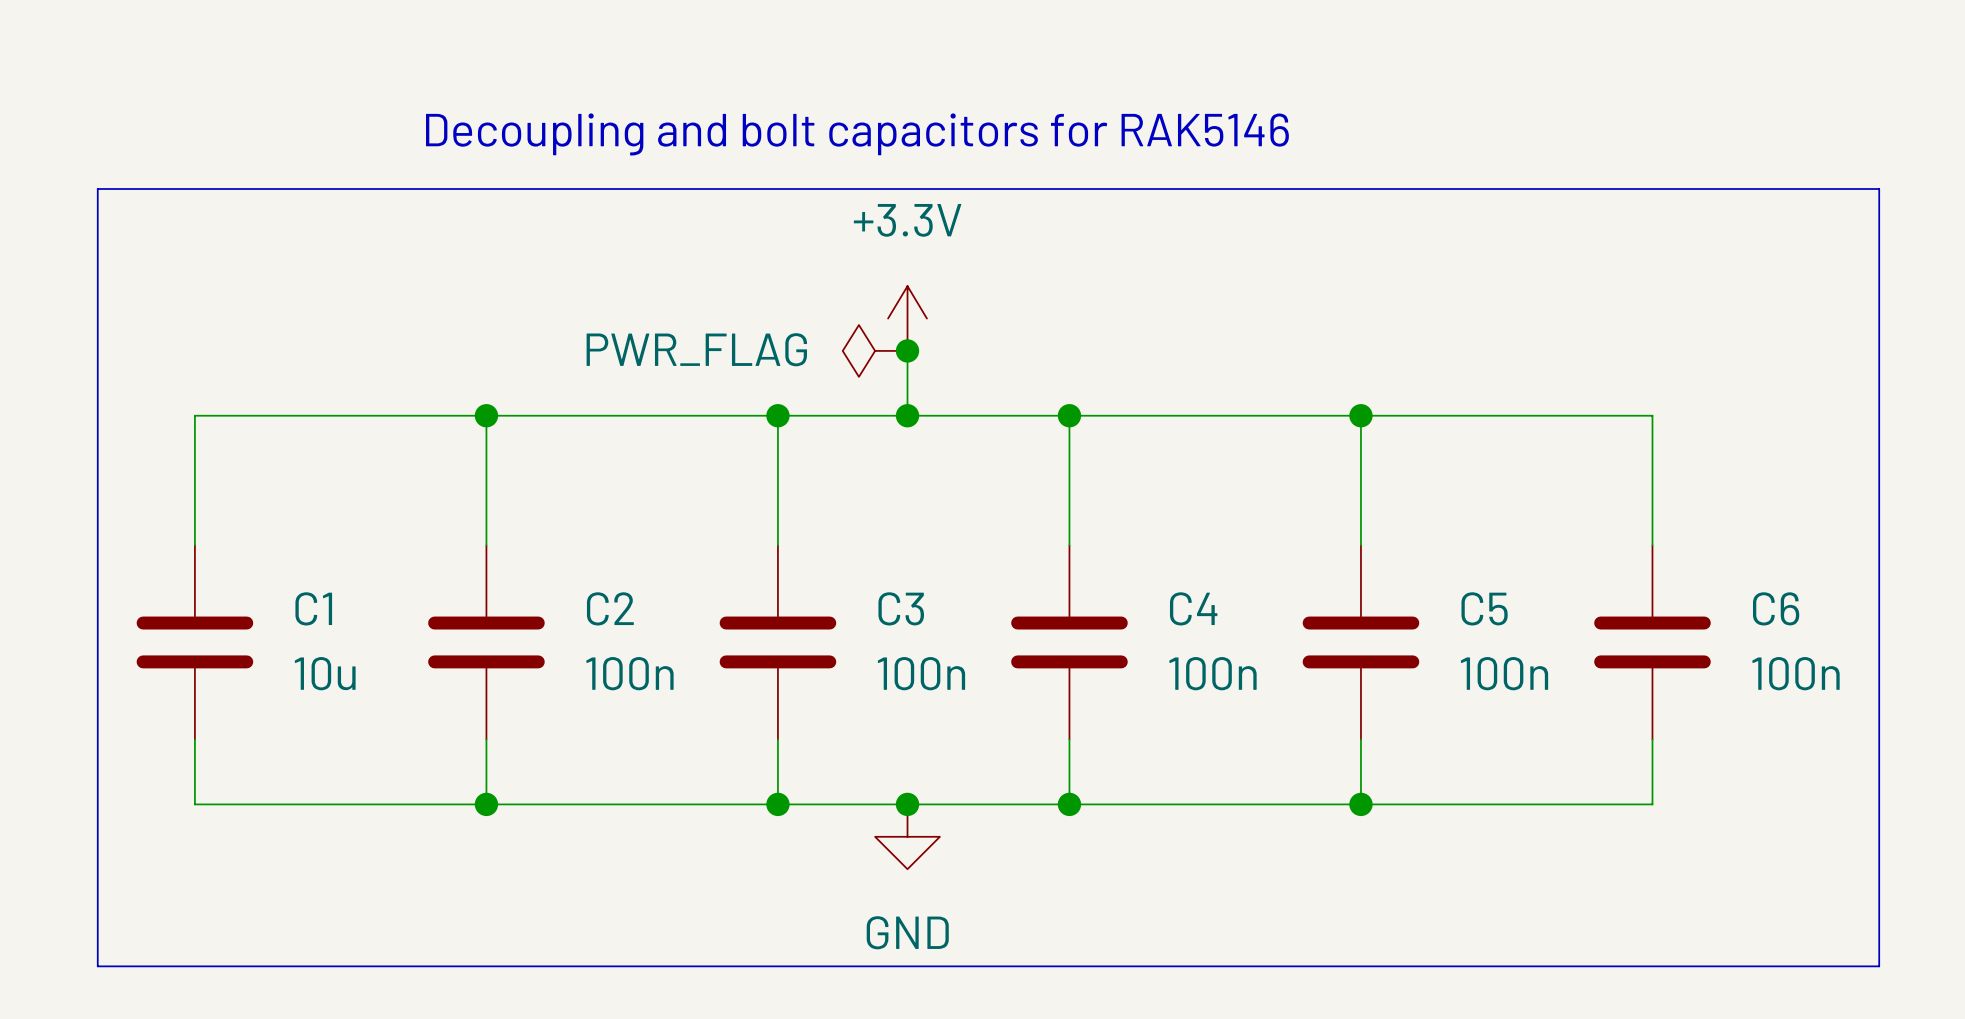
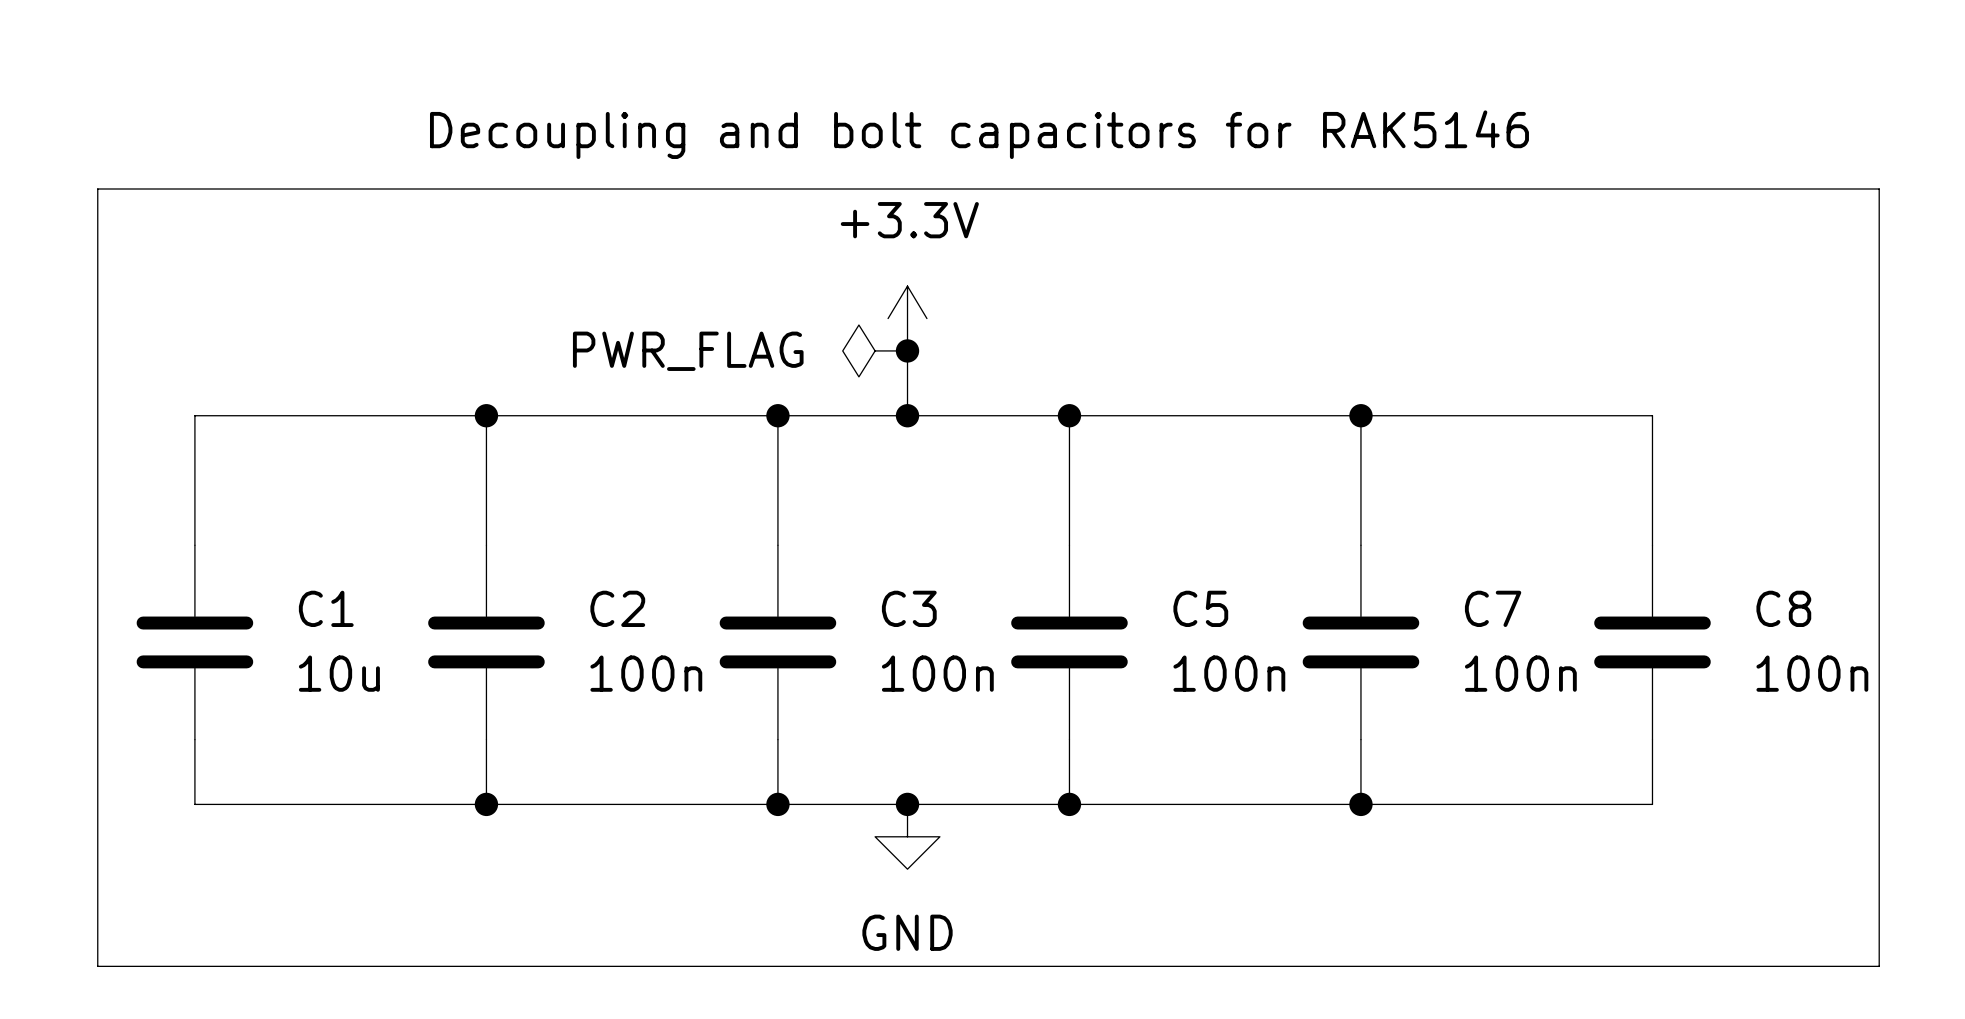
C4 name: C4 (1193, 608) -> C5 (1200, 608)
C5 name: C5 (1484, 608) -> C7 (1493, 608)
C6 name: C6 (1776, 608) -> C8 (1783, 608)

